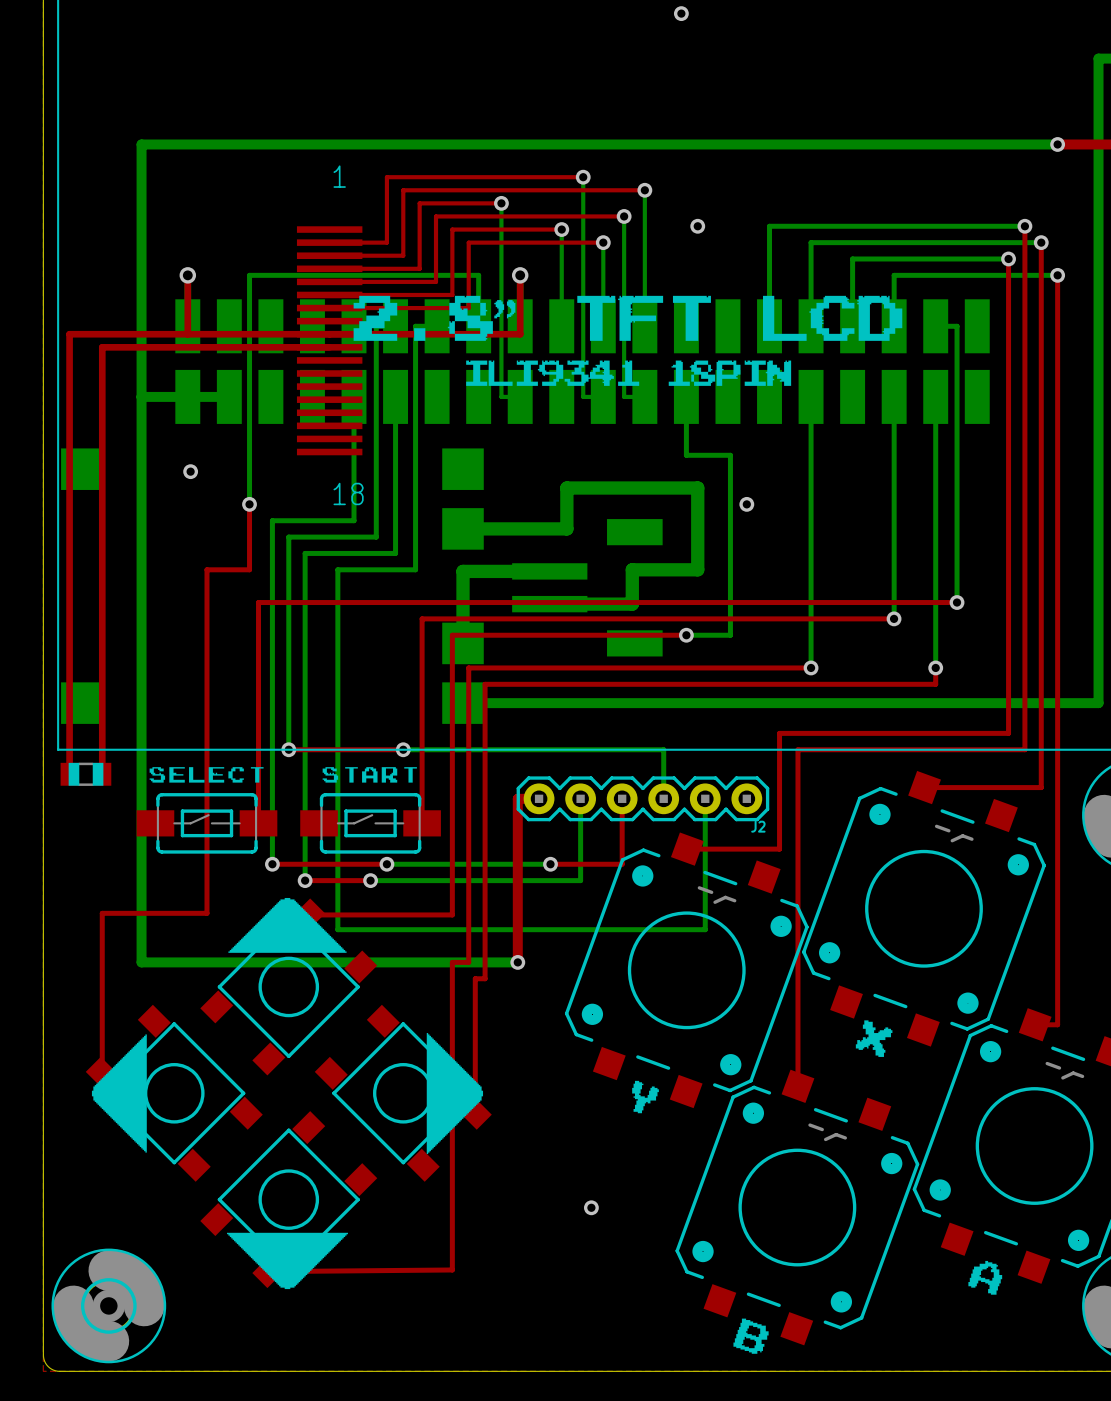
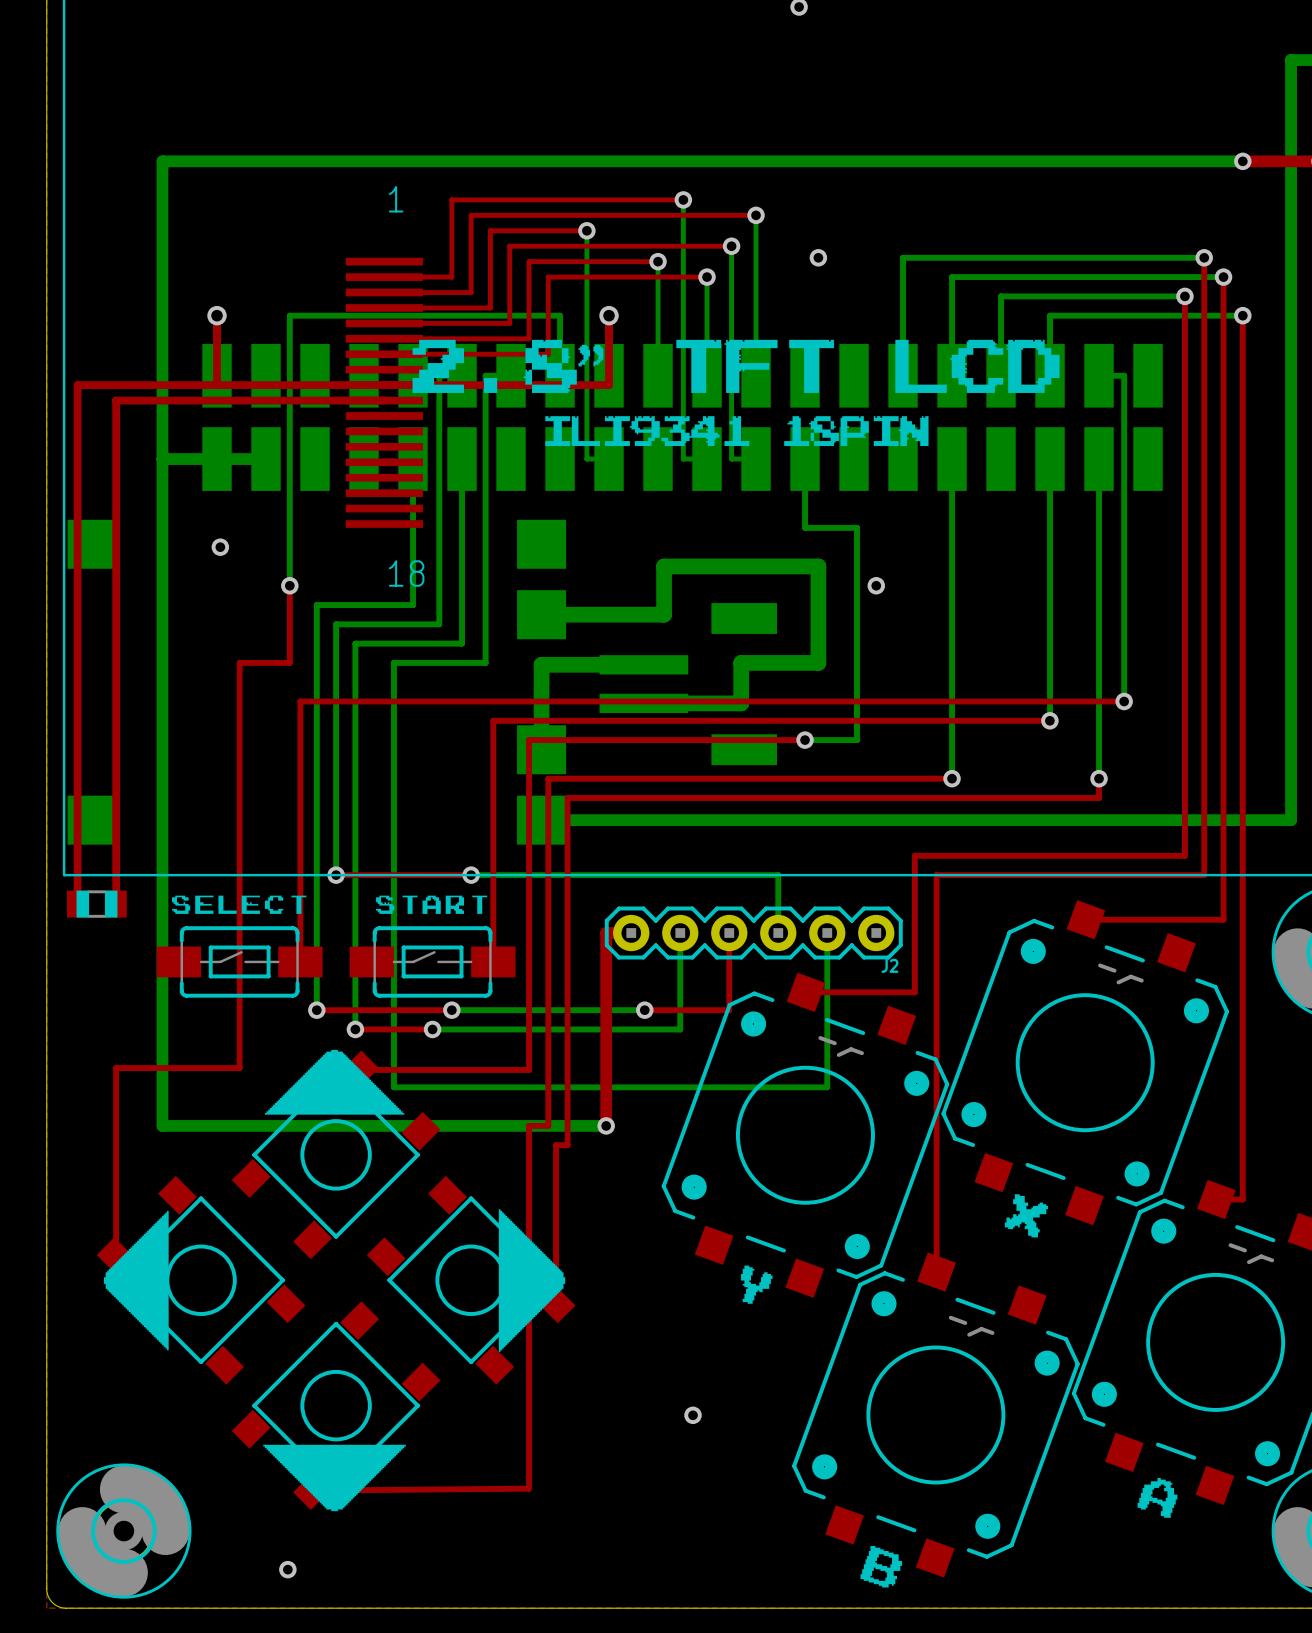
via: none -> (287, 1569)

